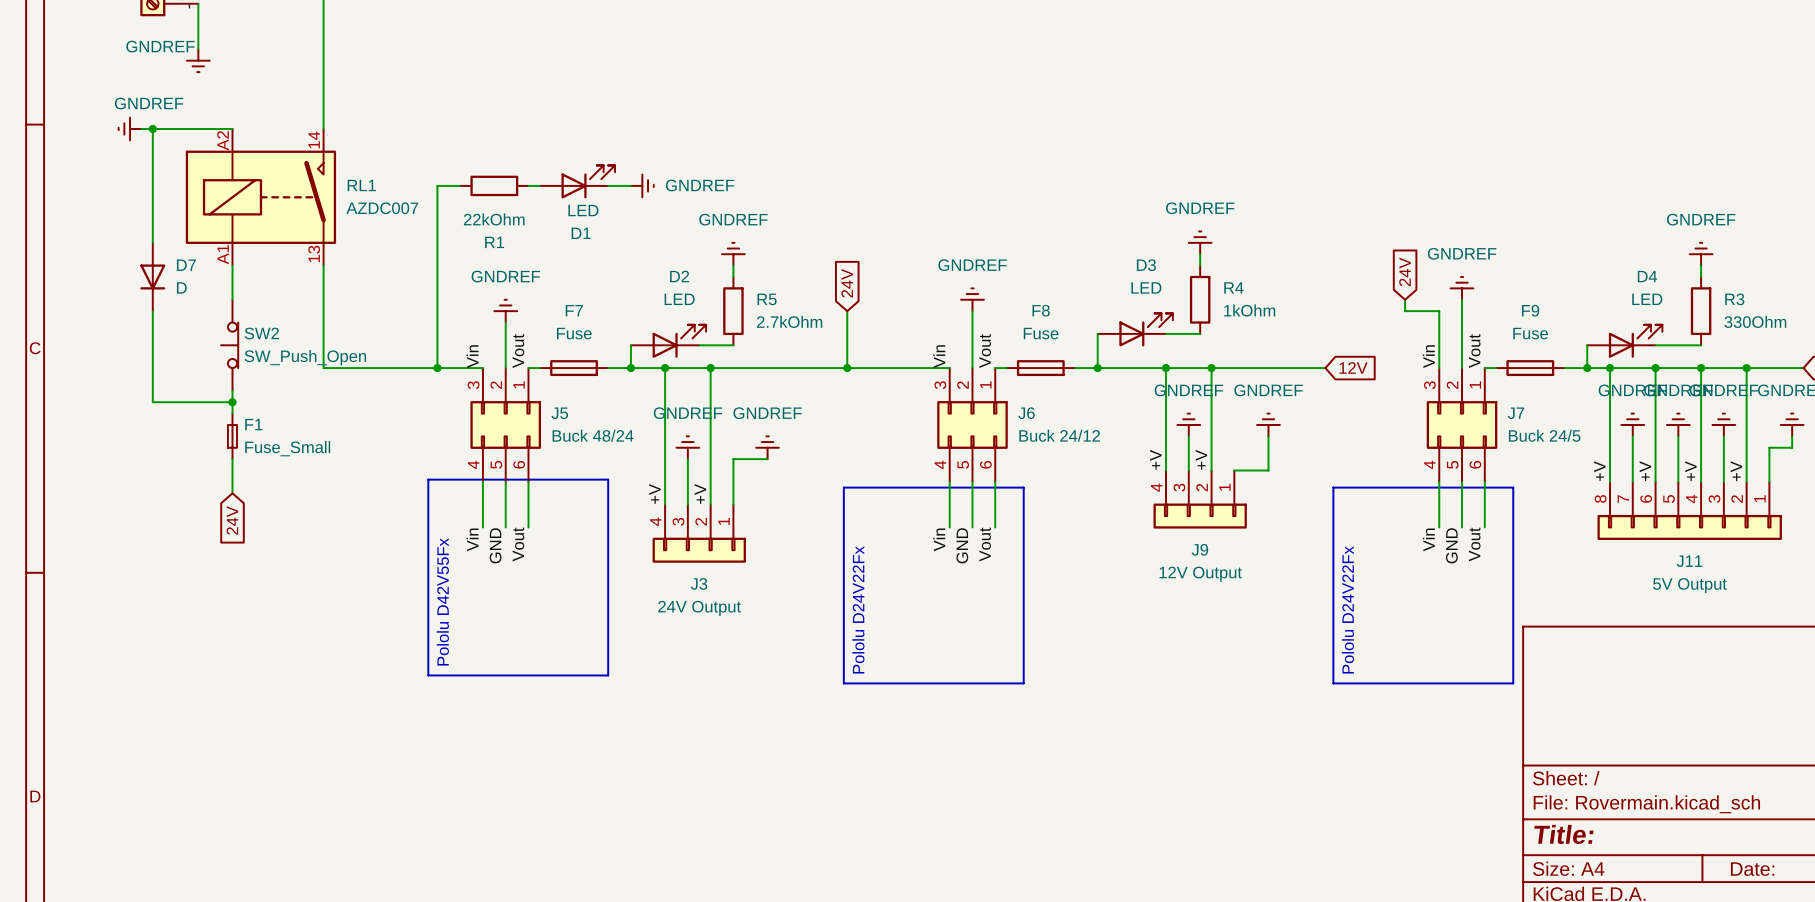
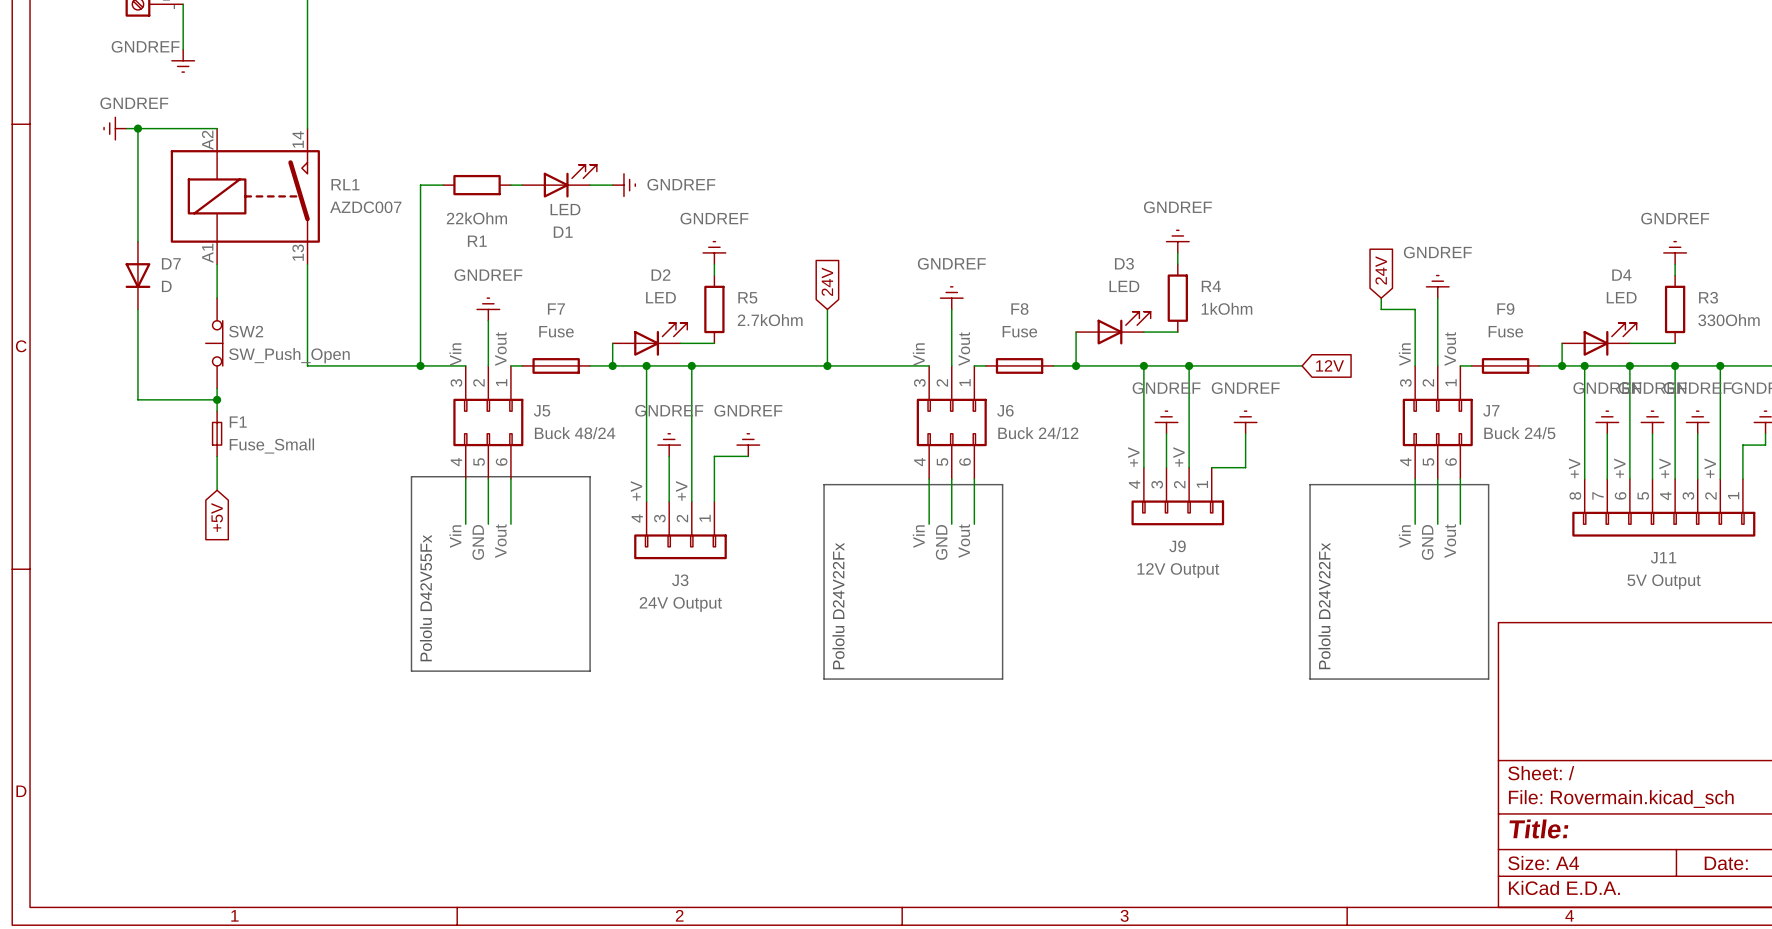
global label: 24V (232, 520) -> +5V (217, 517)

